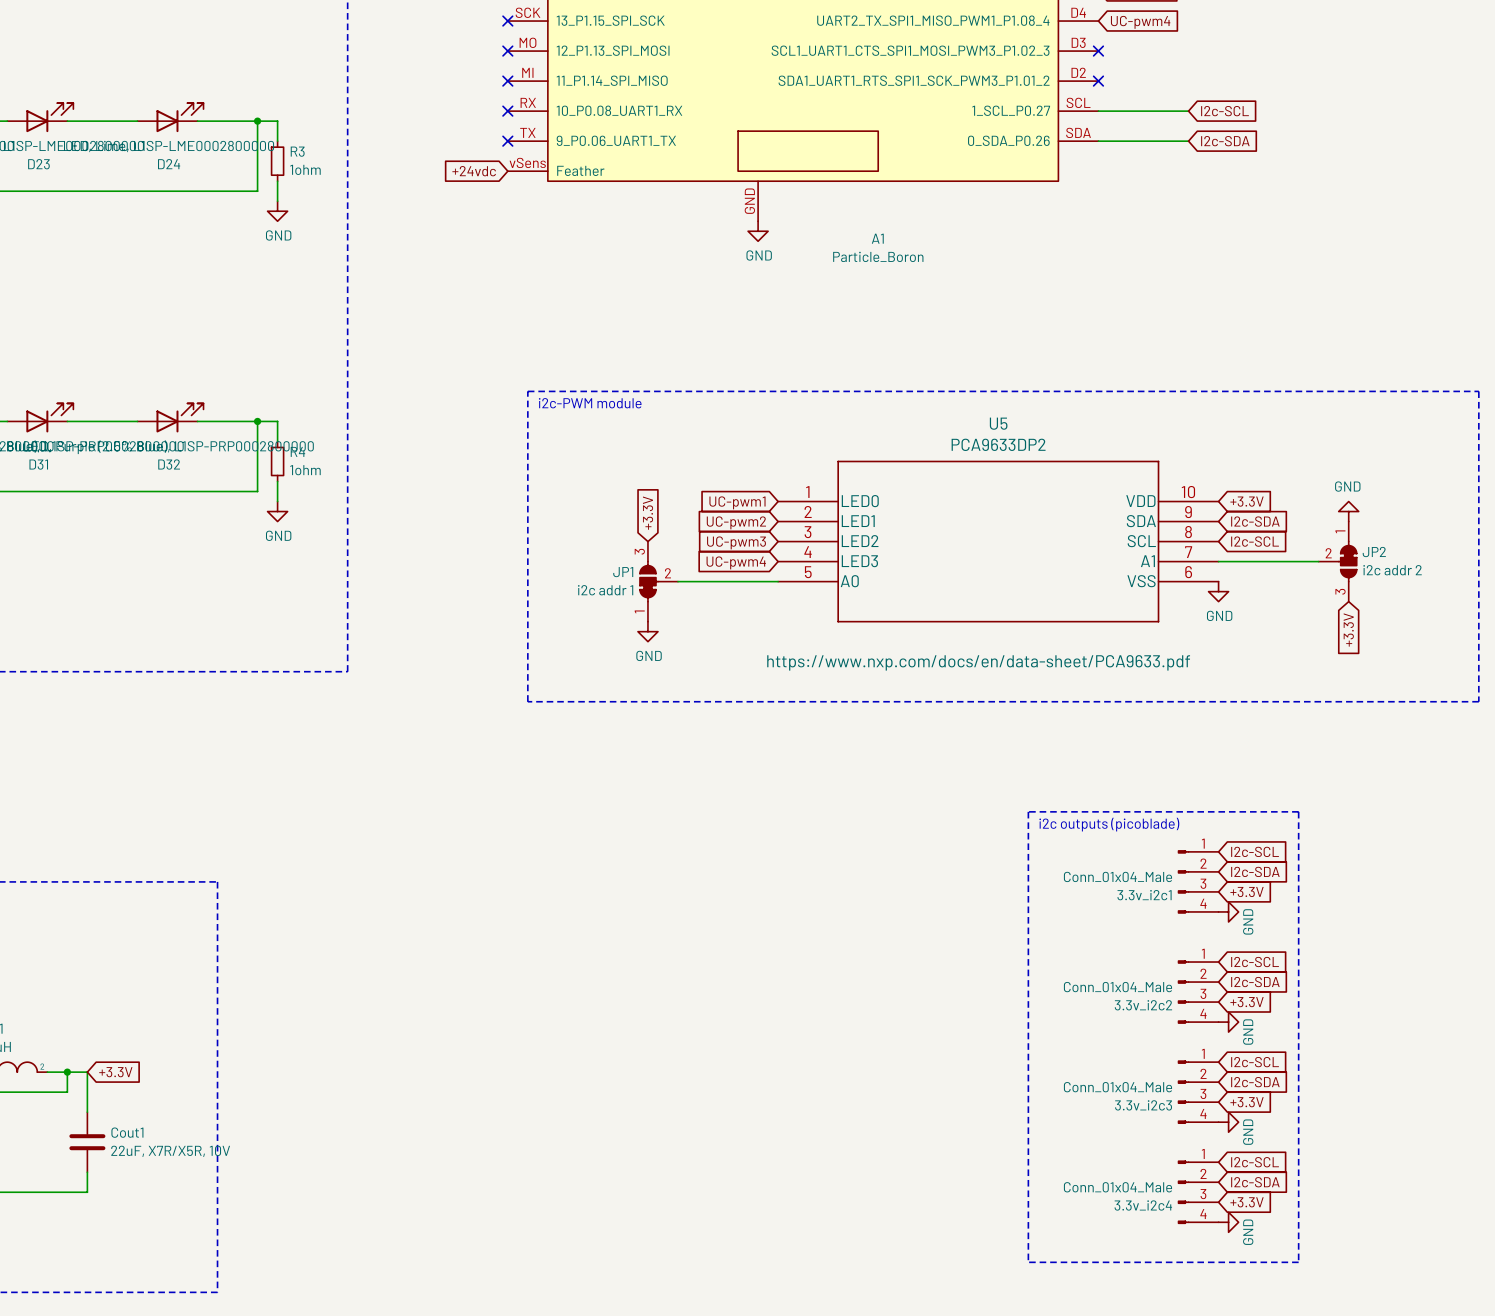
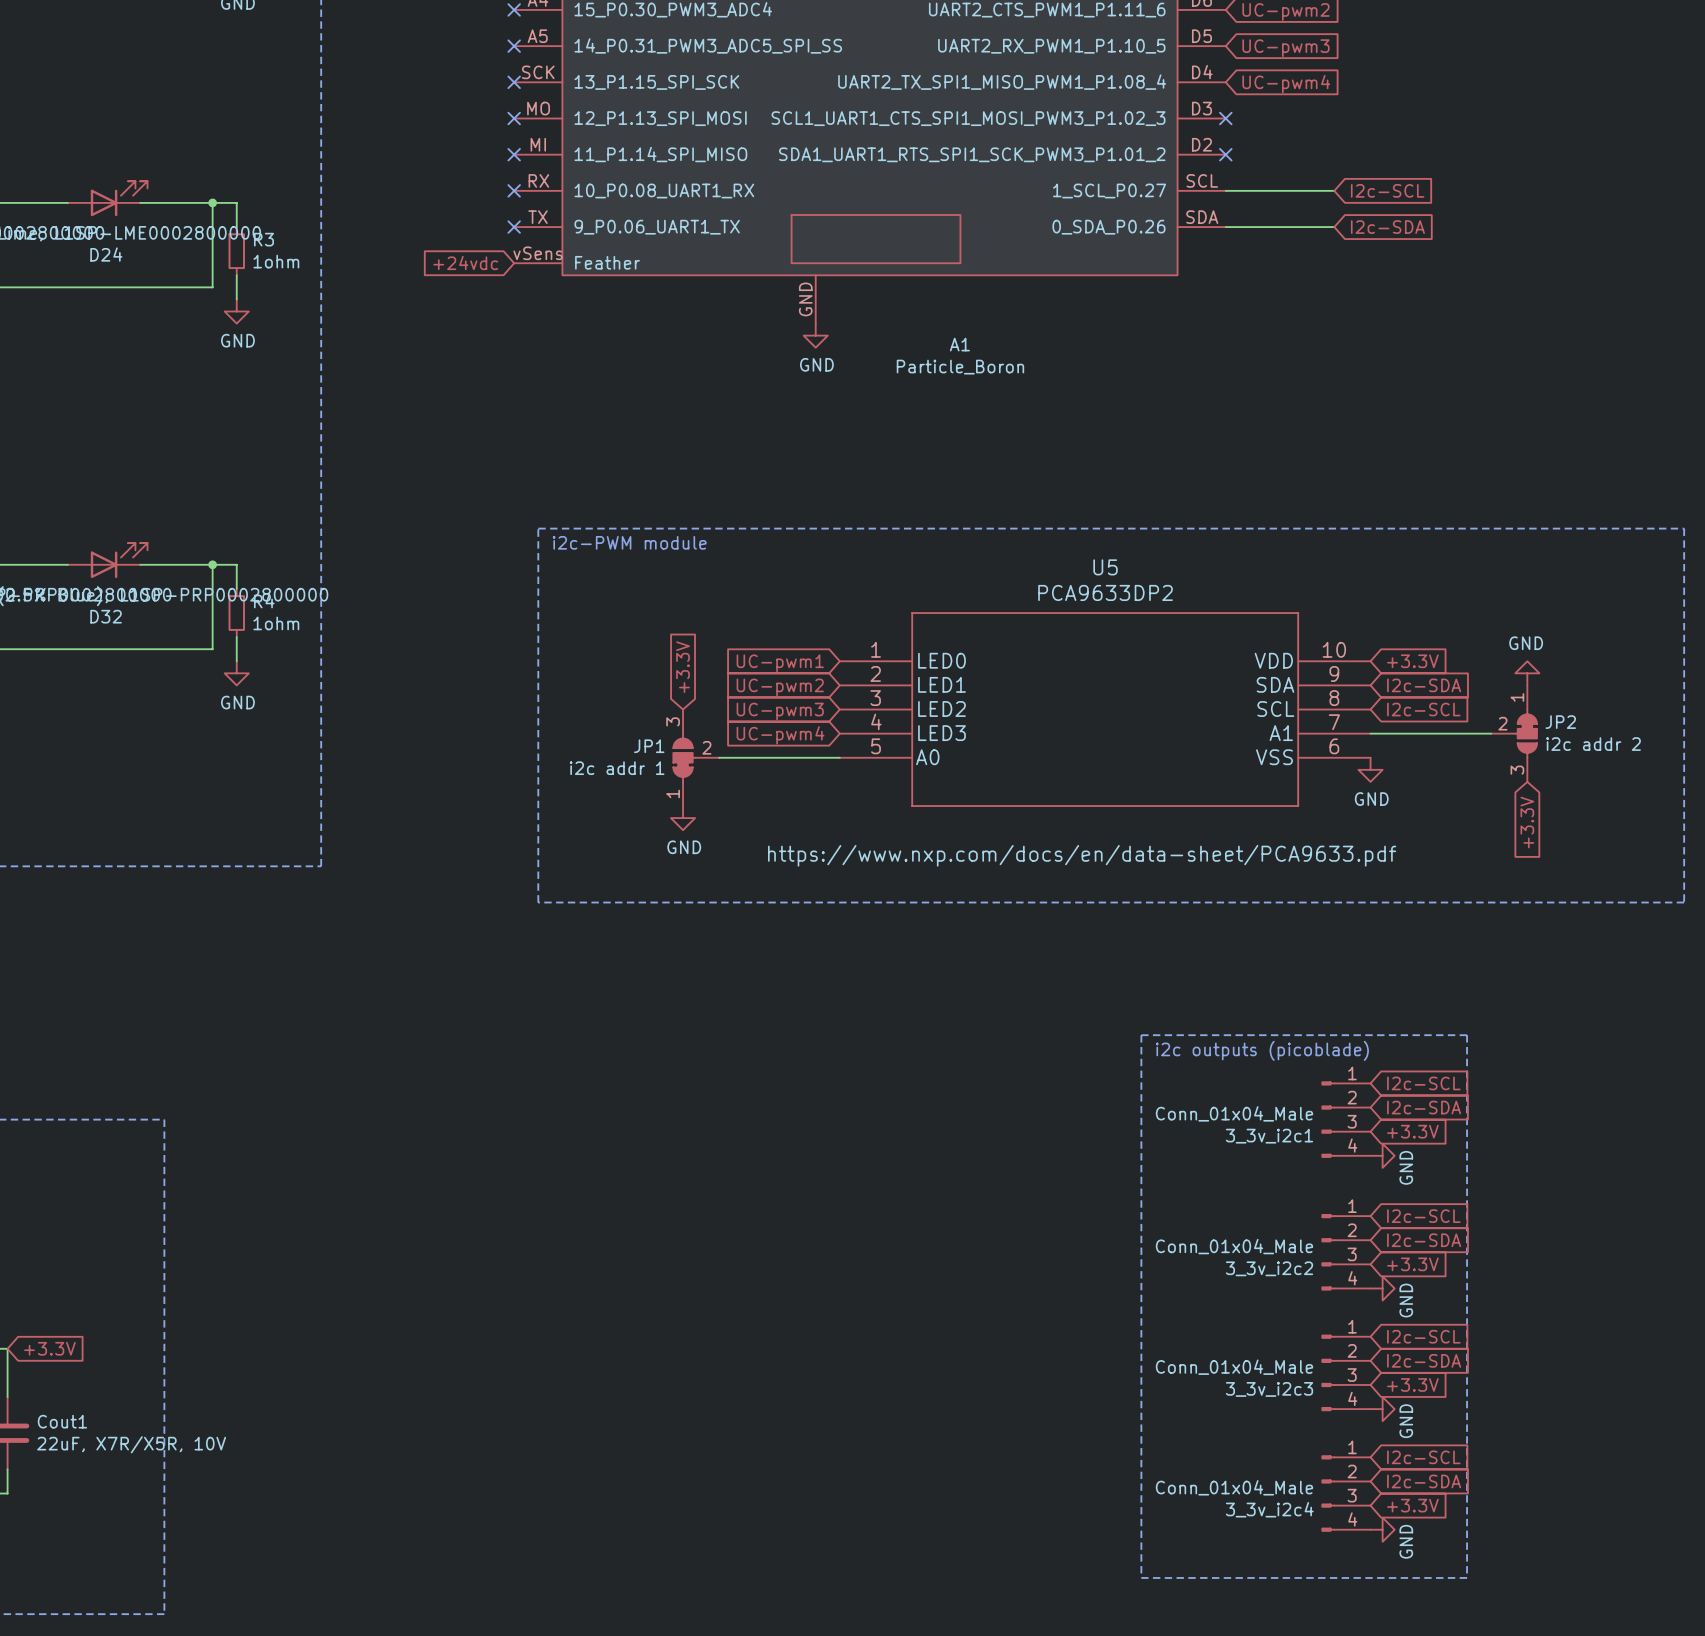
3.3v_i2c1 name: 3.3v_i2c1 (1144, 895) -> 3_3v_i2c1 (1269, 1136)
3.3v_i2c2 name: 3.3v_i2c2 (1143, 1005) -> 3_3v_i2c2 (1269, 1268)
3.3v_i2c3 name: 3.3v_i2c3 (1143, 1105) -> 3_3v_i2c3 (1269, 1389)
3.3v_i2c4 name: 3.3v_i2c4 (1143, 1205) -> 3_3v_i2c4 (1269, 1509)

